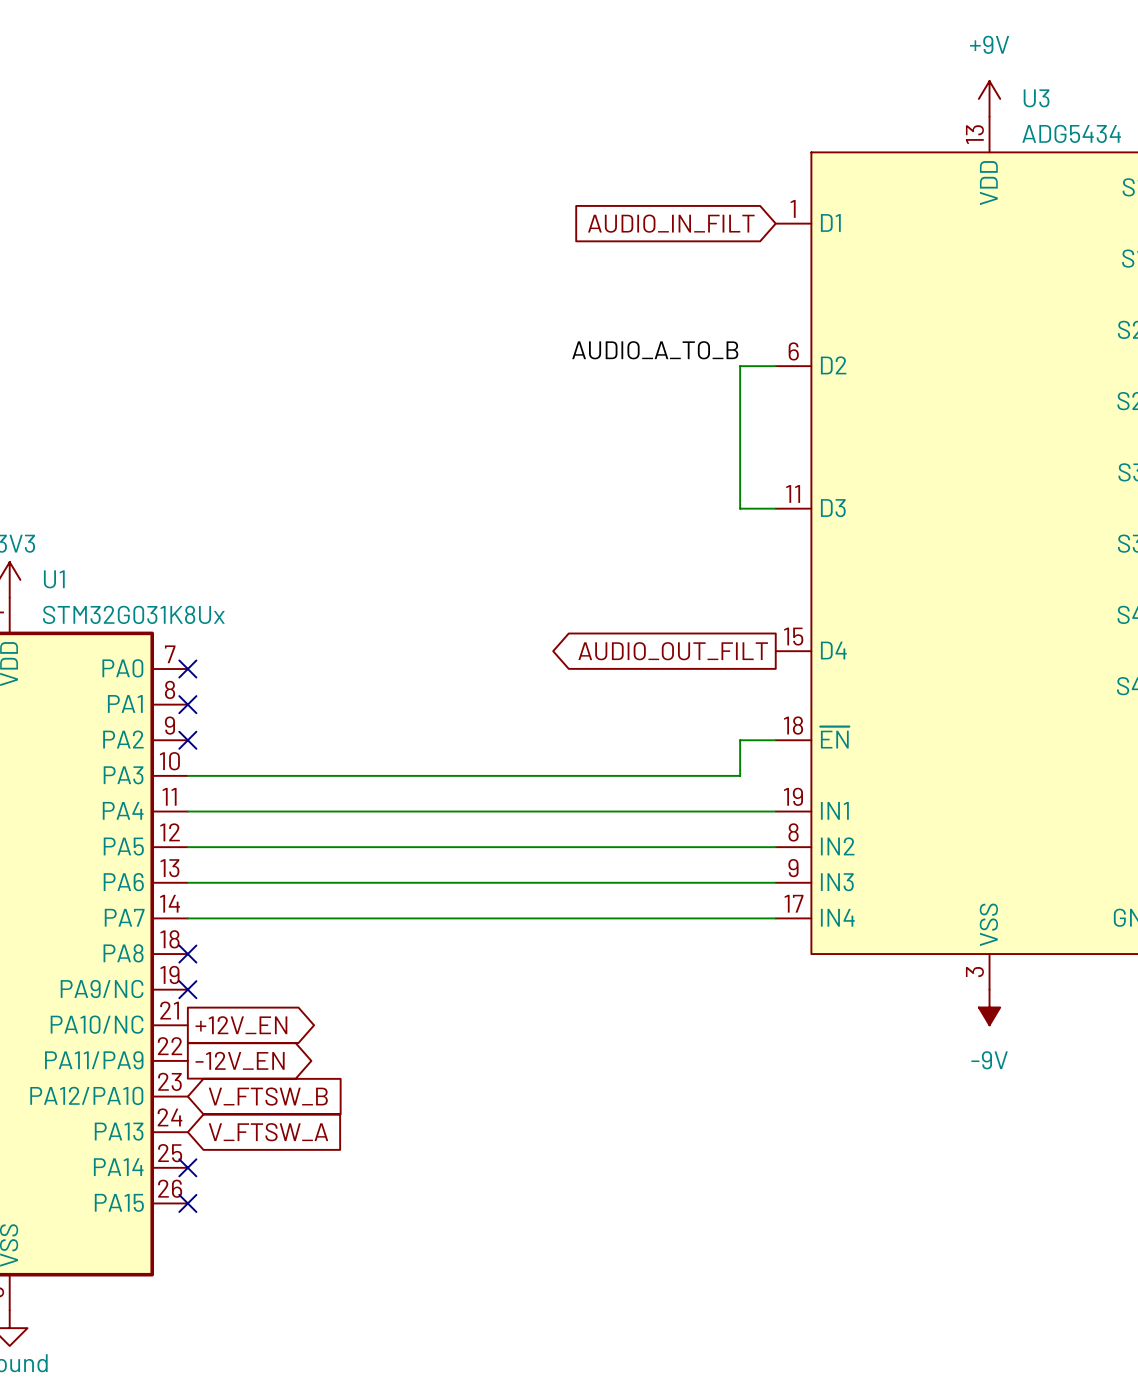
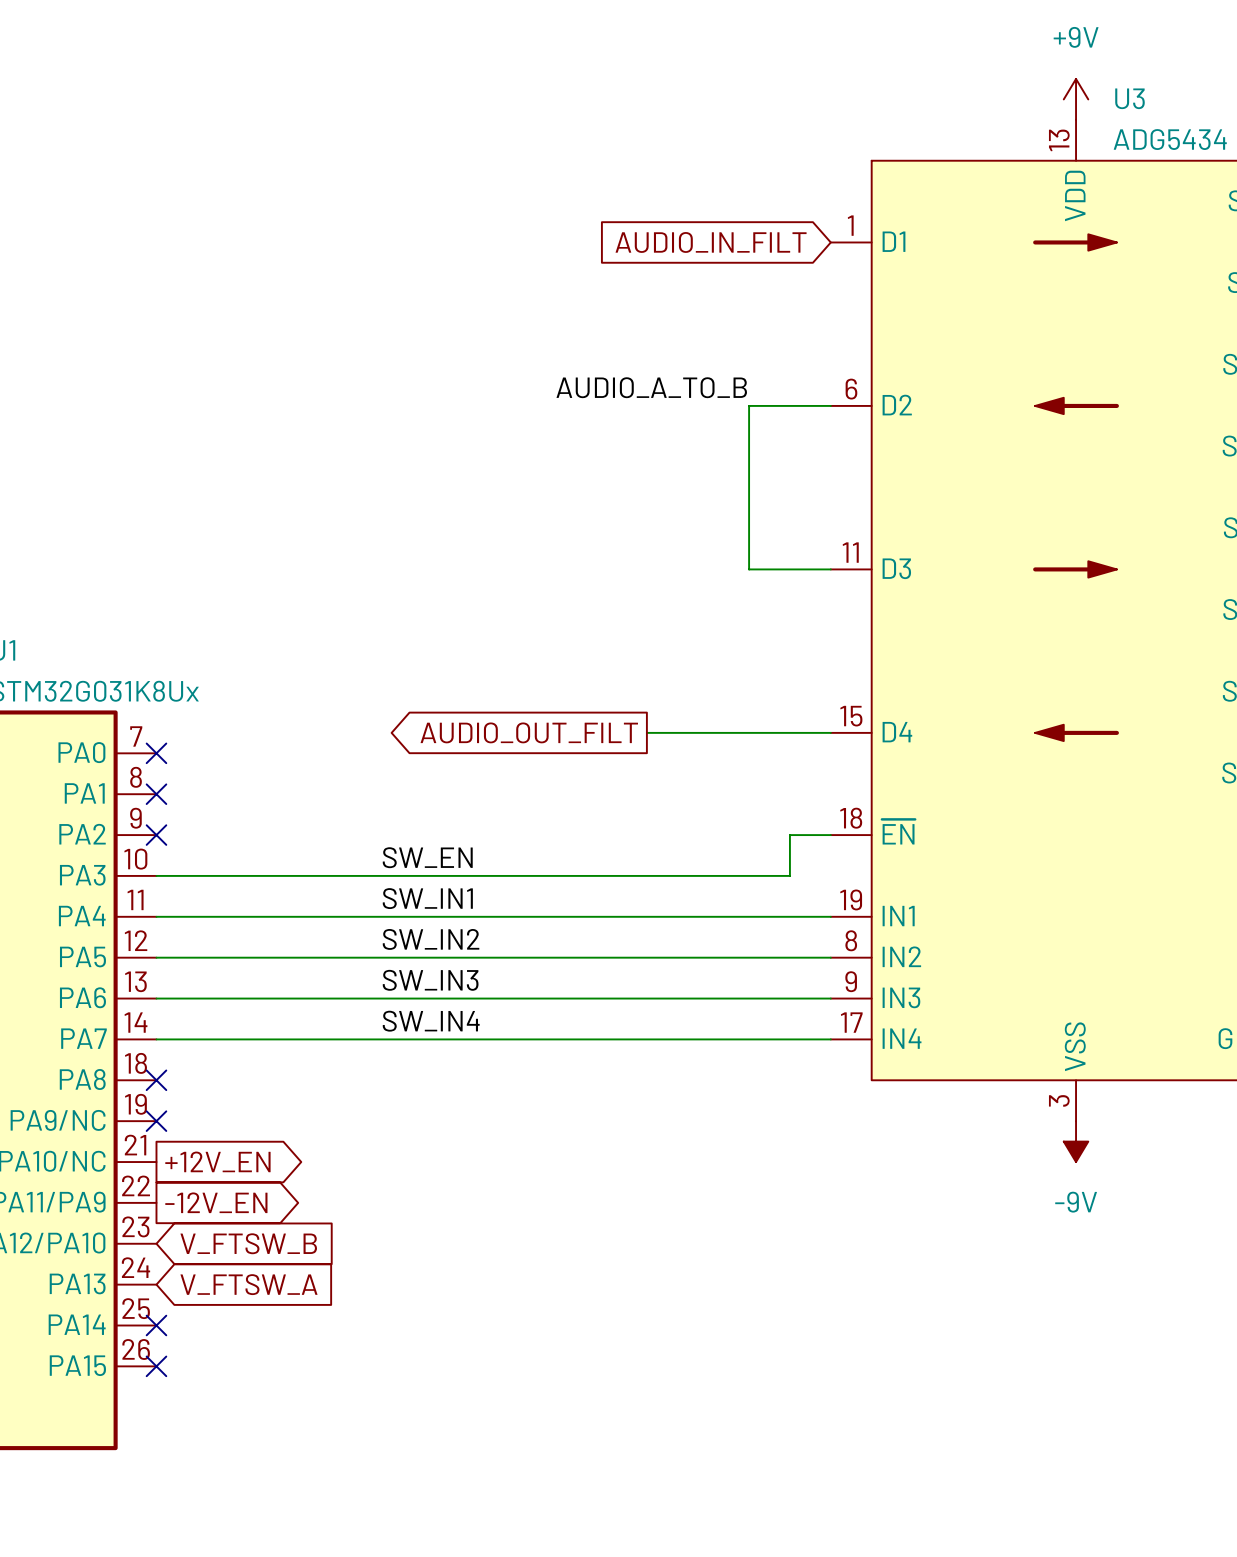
power symbol: none -> (1075, 242)
label position: AUDIO_A_TO_B (655, 350) -> AUDIO_A_TO_B (651, 387)
wire: (740, 366) (740, 508) -> (789, 405) (749, 405) (749, 569) (789, 569)
power symbol: none -> (1077, 405)
power symbol: none -> (1075, 569)
wire: none -> (646, 732) (830, 732)
global label position: AUDIO_OUT_FILT (673, 651) -> AUDIO_OUT_FILT (529, 732)
power symbol: none -> (1077, 732)
label: none -> SW_EN (427, 857)
label: none -> SW_IN1 (427, 898)
label: none -> SW_IN2 (431, 939)
label: none -> SW_IN3 (430, 980)
label: none -> SW_IN4 (431, 1021)

